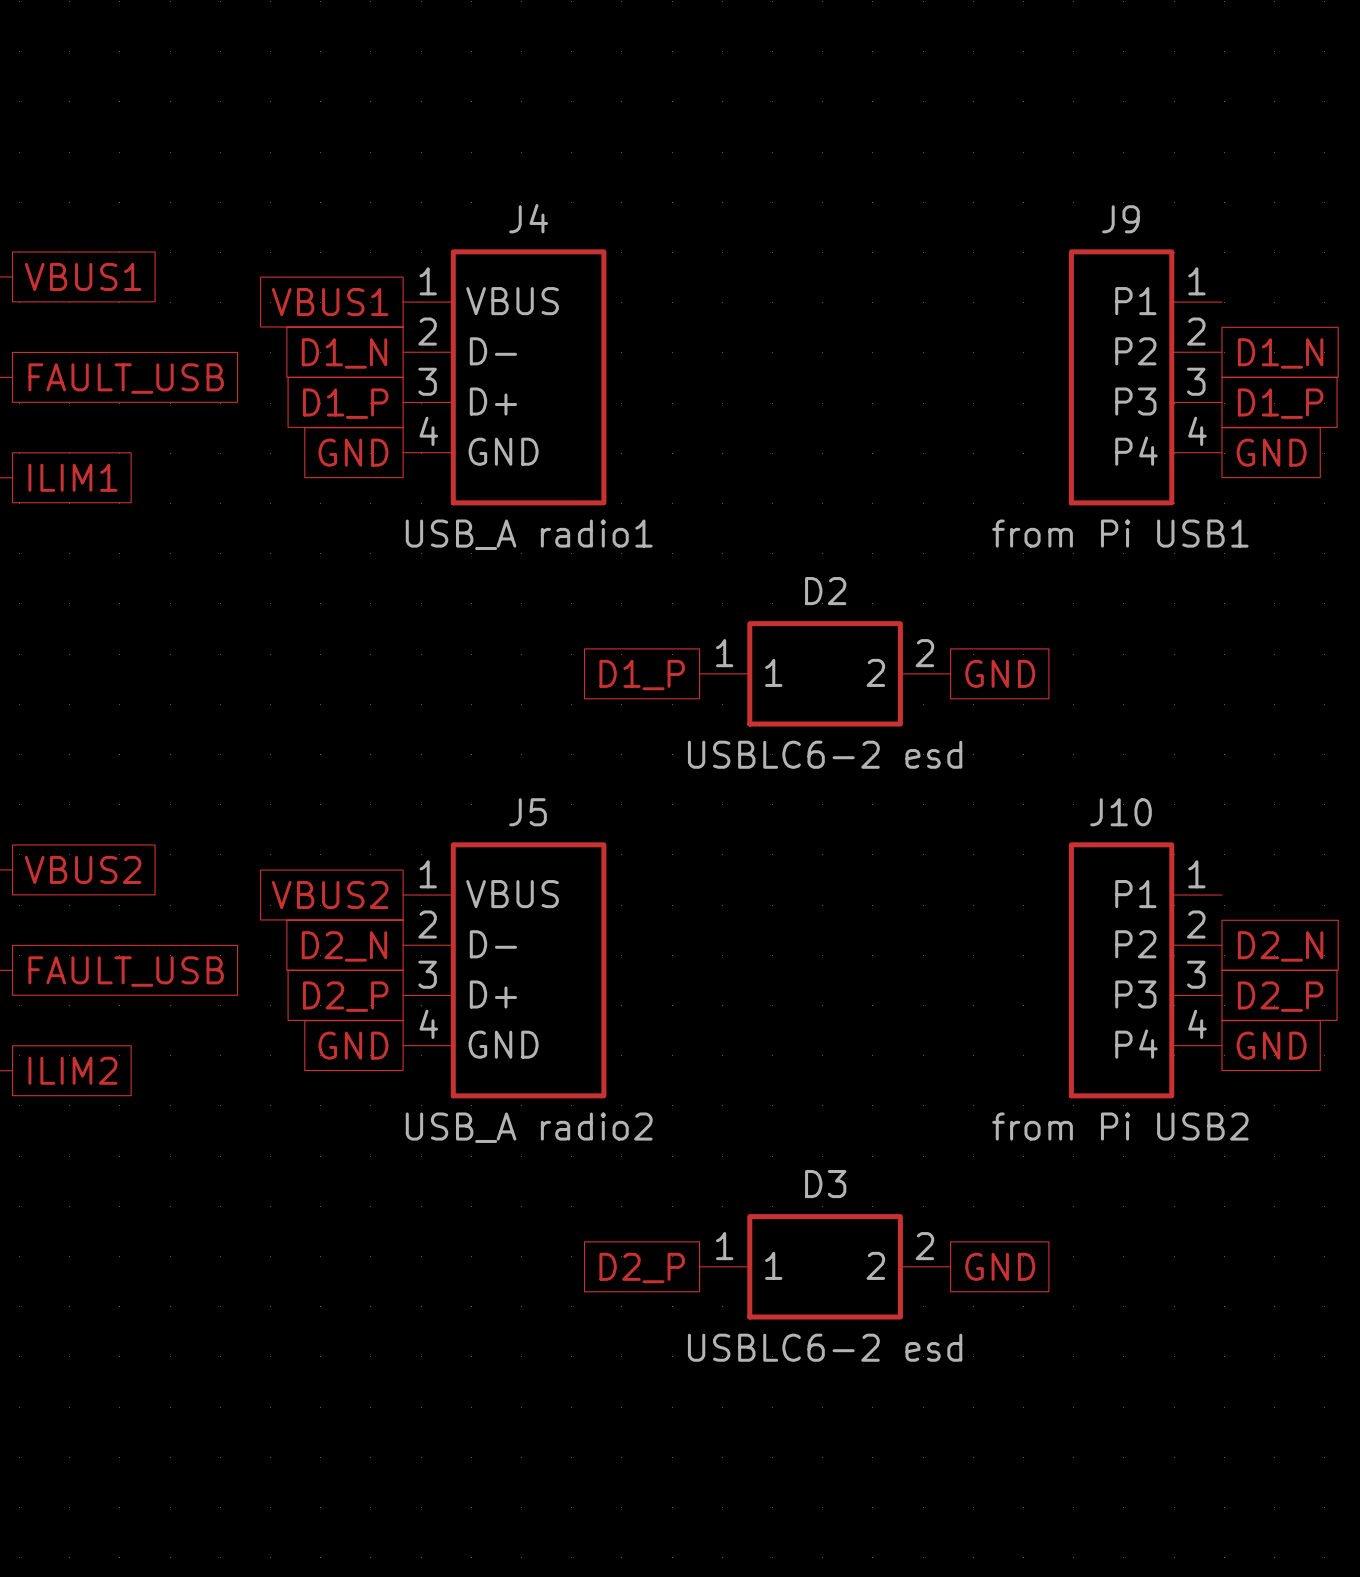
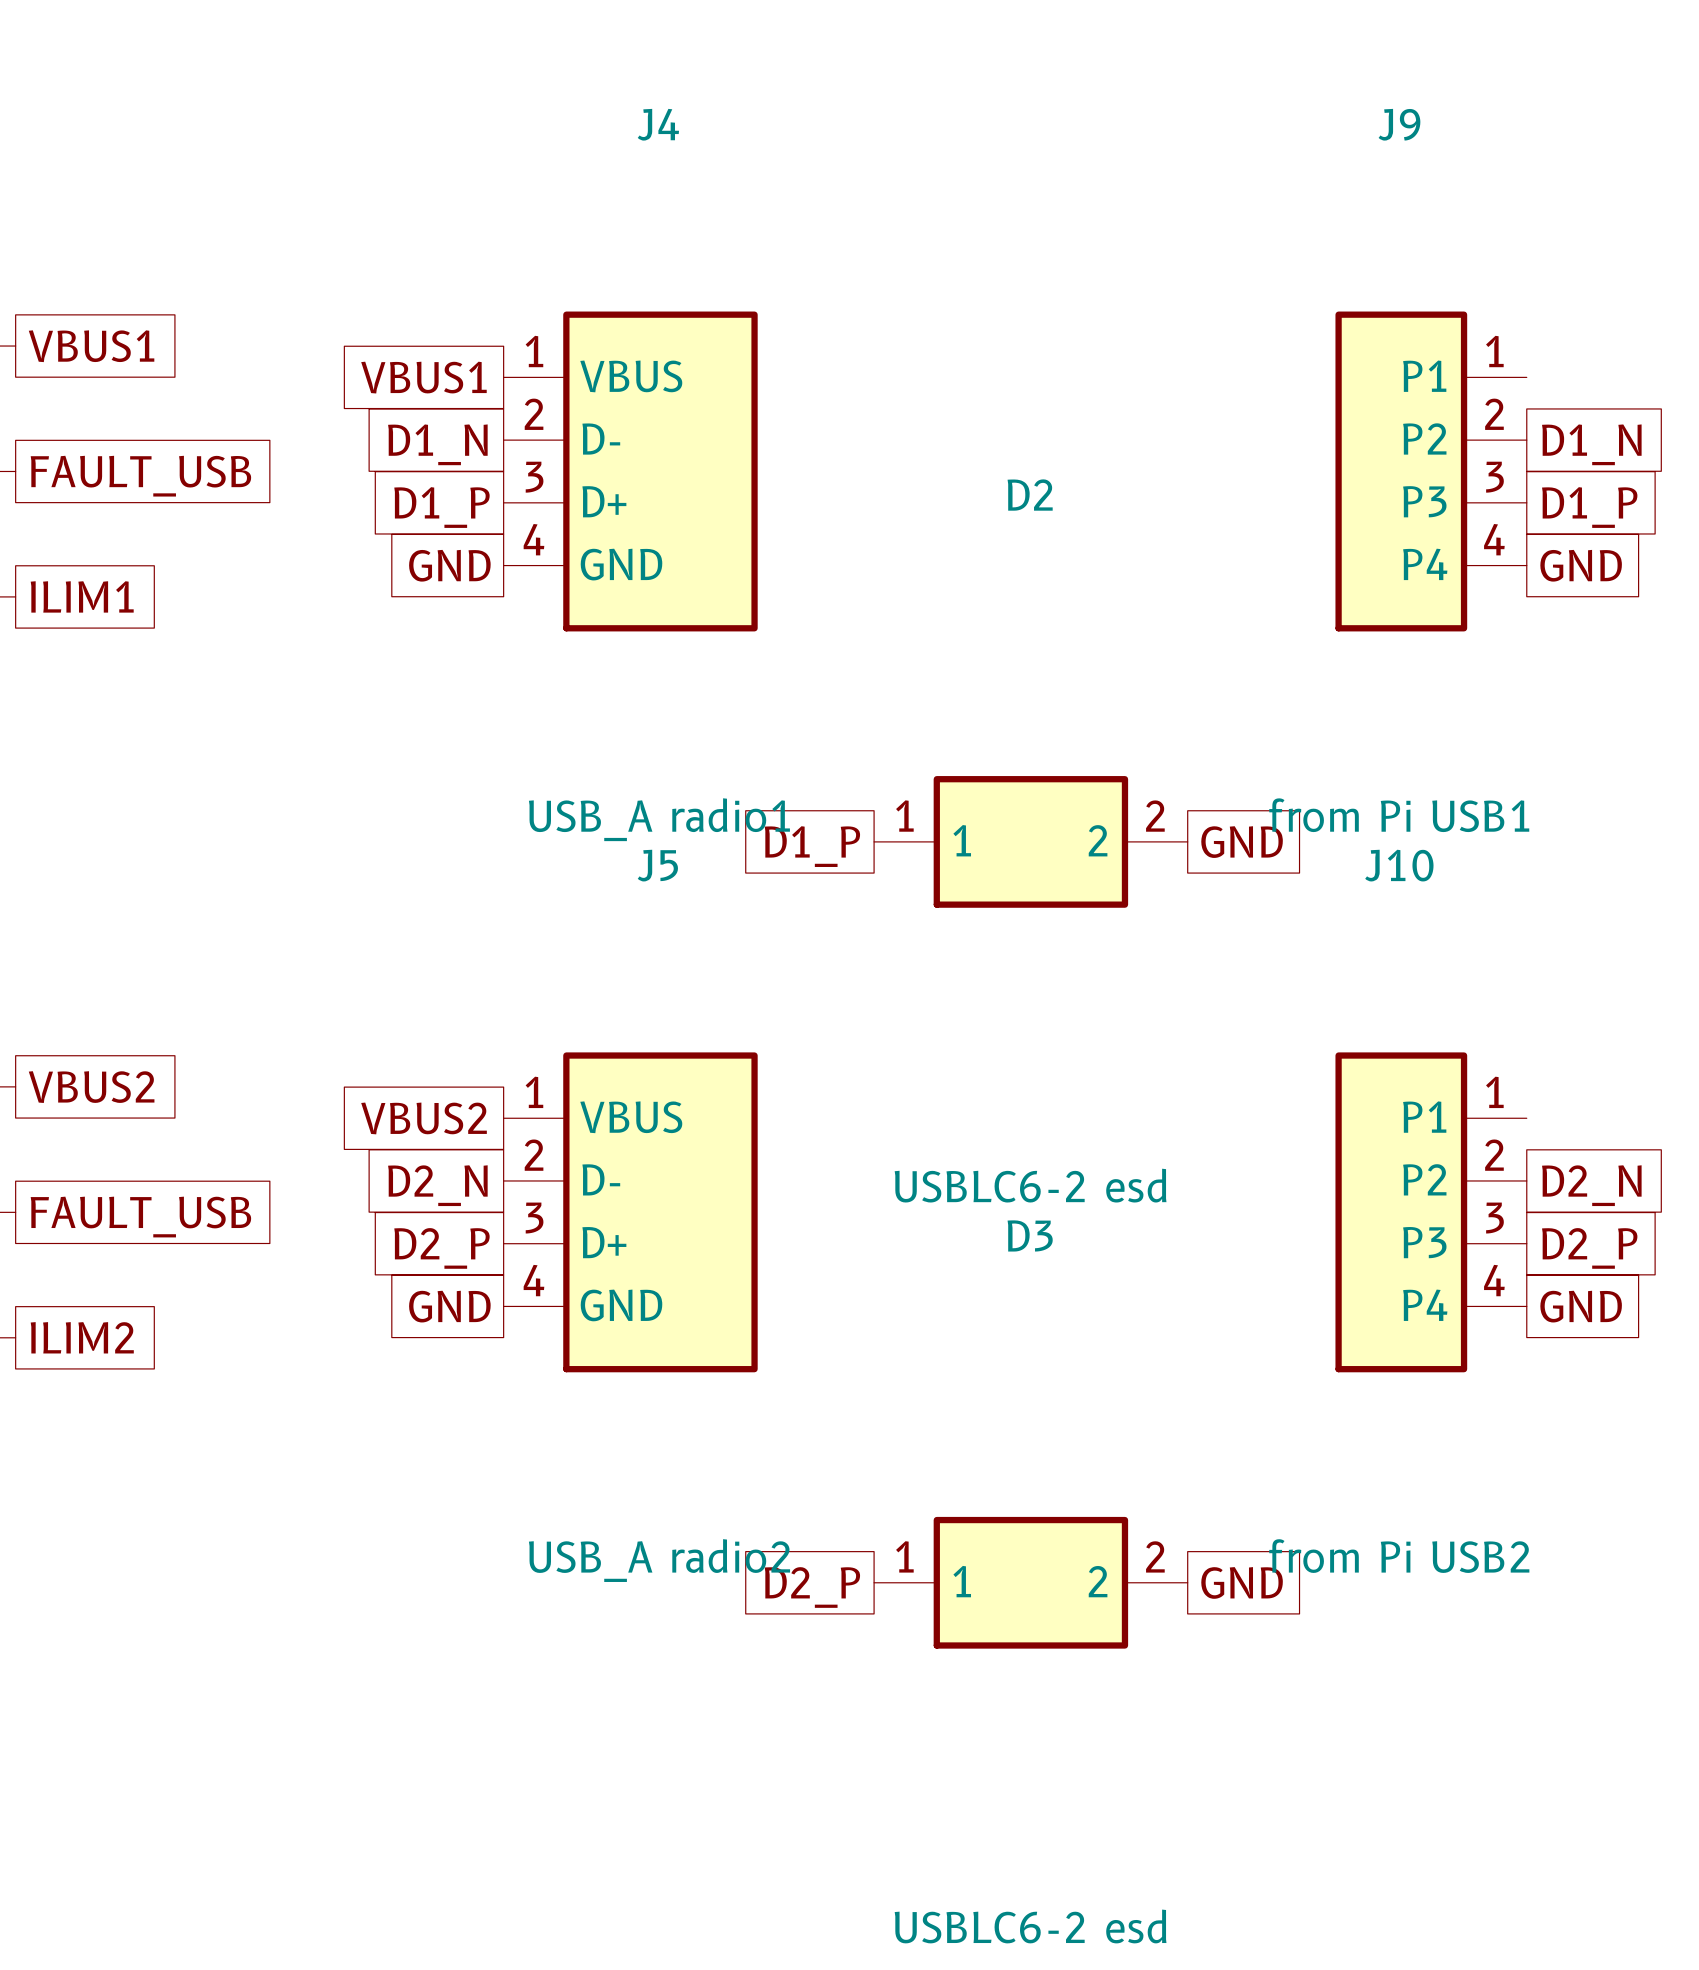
J4 name position: J4 (528, 218) -> J4 (658, 124)
J9 name position: J9 (1120, 219) -> J9 (1399, 124)
J9 value position: from Pi USB1 (1120, 533) -> from Pi USB1 (1399, 815)
J4 value position: USB_A radio1 (529, 534) -> USB_A radio1 (659, 819)
D2 name position: D2 (825, 591) -> D2 (1030, 495)
D2 value position: USBLC6-2 esd (825, 754) -> USBLC6-2 esd (1030, 1185)
J5 name position: J5 (528, 812) -> J5 (657, 865)
J10 name position: J10 (1120, 812) -> J10 (1399, 865)
J10 value position: from Pi USB2 (1120, 1126) -> from Pi USB2 (1399, 1556)
J5 value position: USB_A radio2 (529, 1127) -> USB_A radio2 (659, 1560)
D3 name position: D3 (825, 1184) -> D3 (1030, 1235)
D3 value position: USBLC6-2 esd (825, 1347) -> USBLC6-2 esd (1030, 1926)

